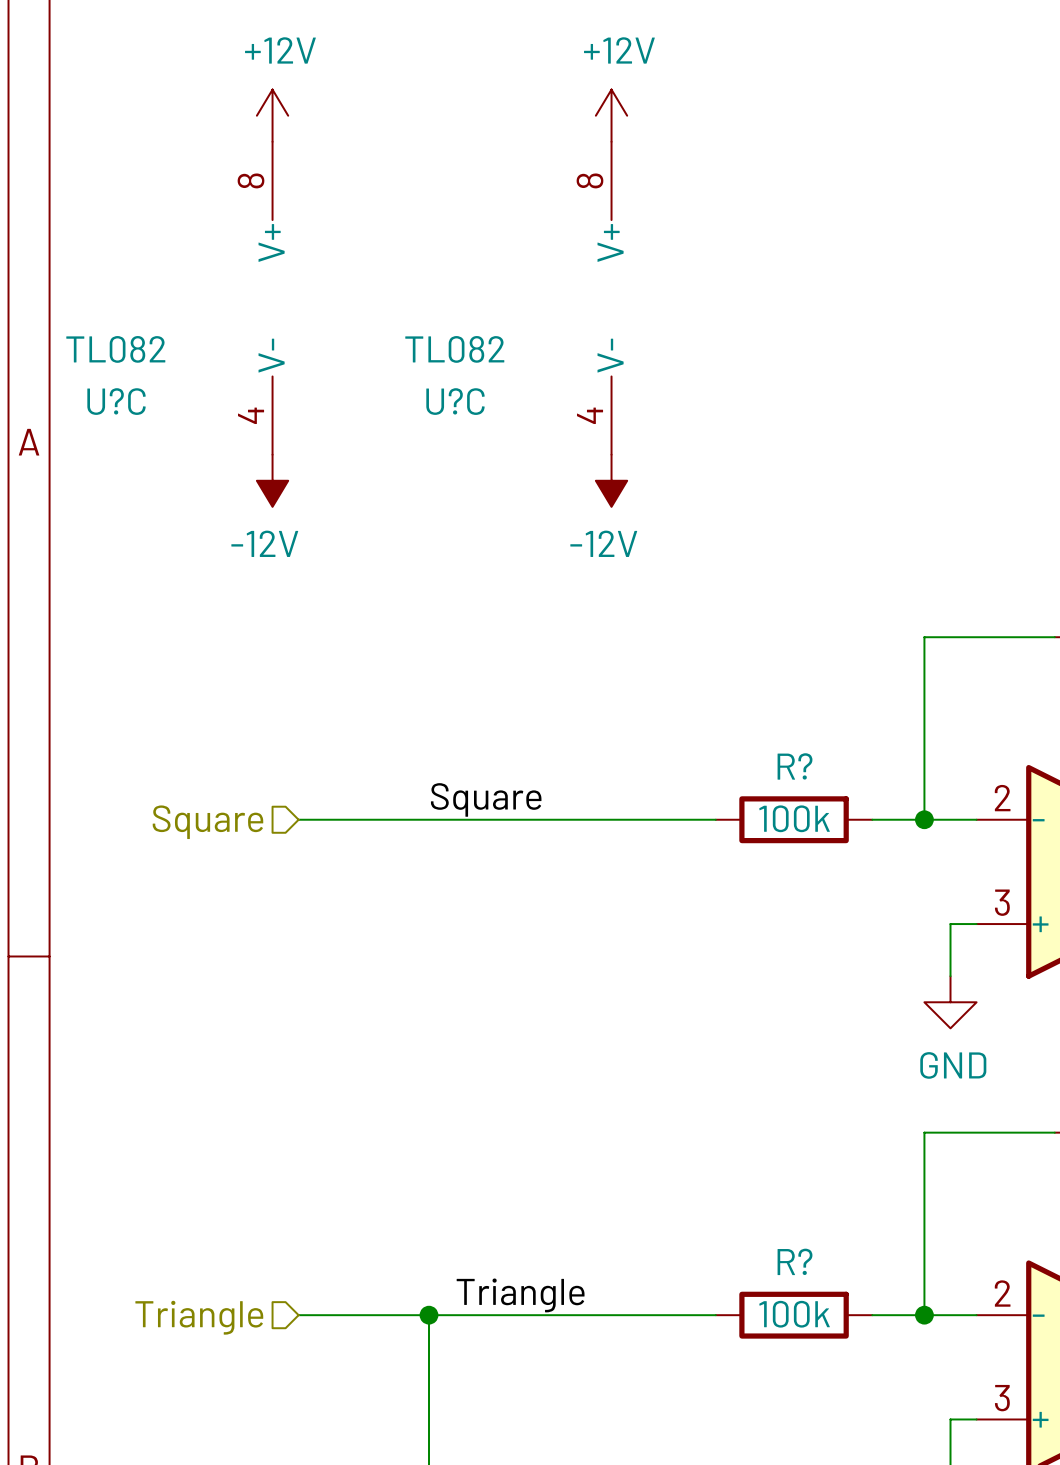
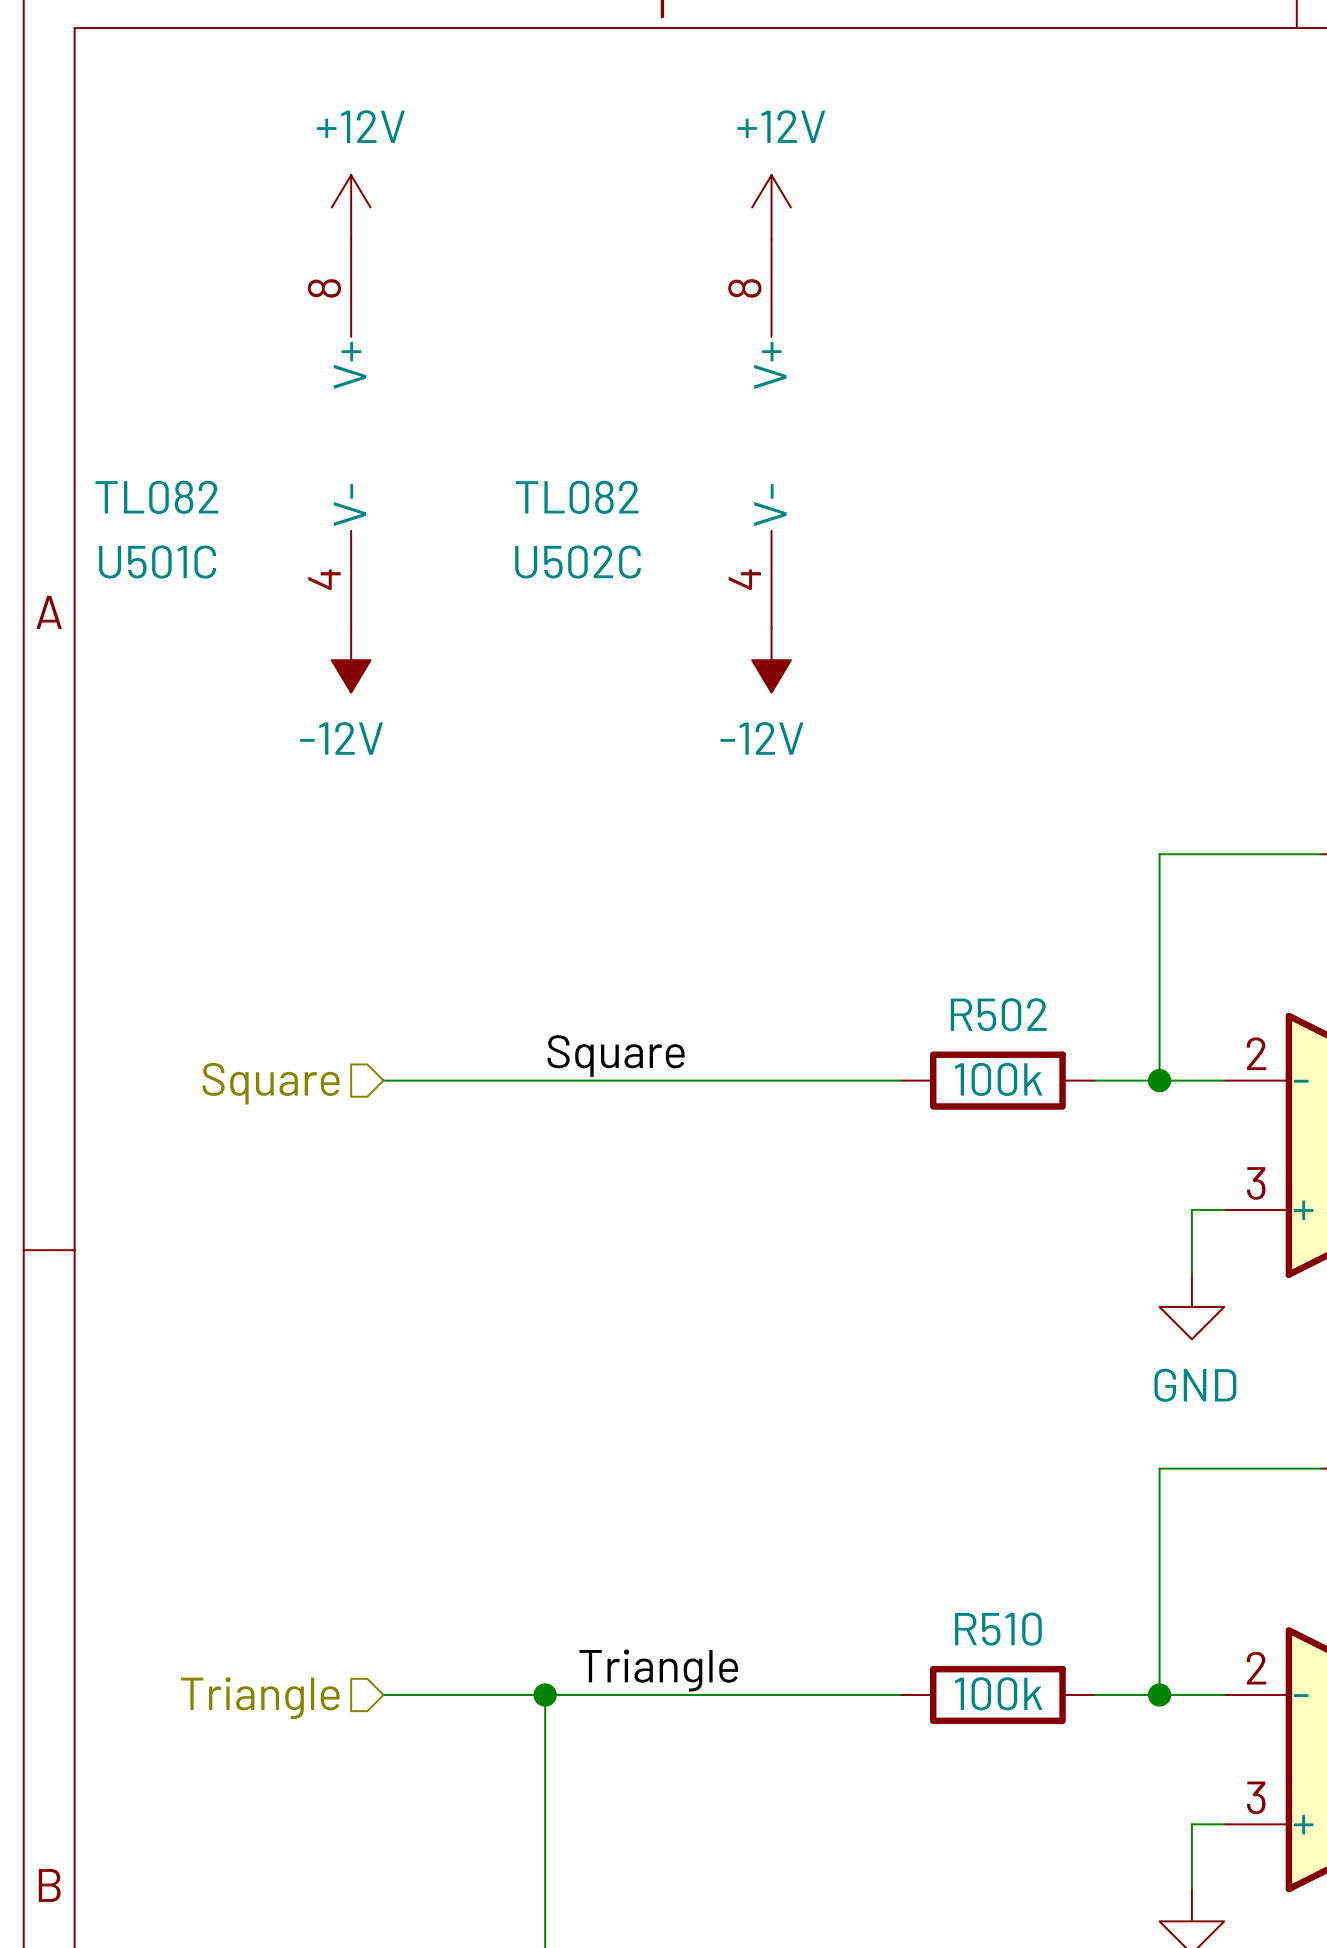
U?C name: U?C (116, 401) -> U501C (157, 562)
U?C name: U?C (455, 401) -> U502C (578, 562)
R? name: R? (795, 766) -> R502 (998, 1014)
R? name: R? (795, 1261) -> R510 (998, 1629)

